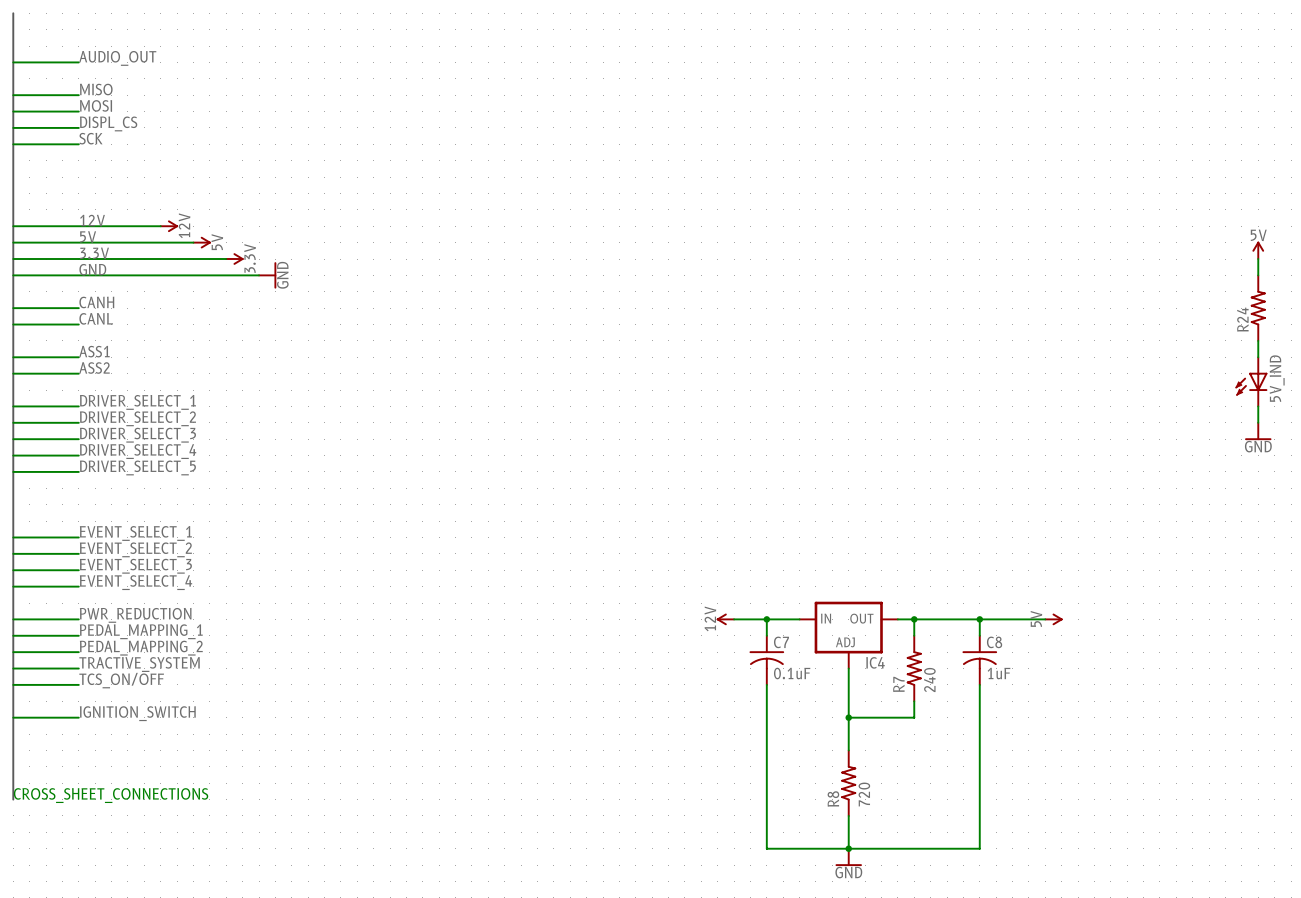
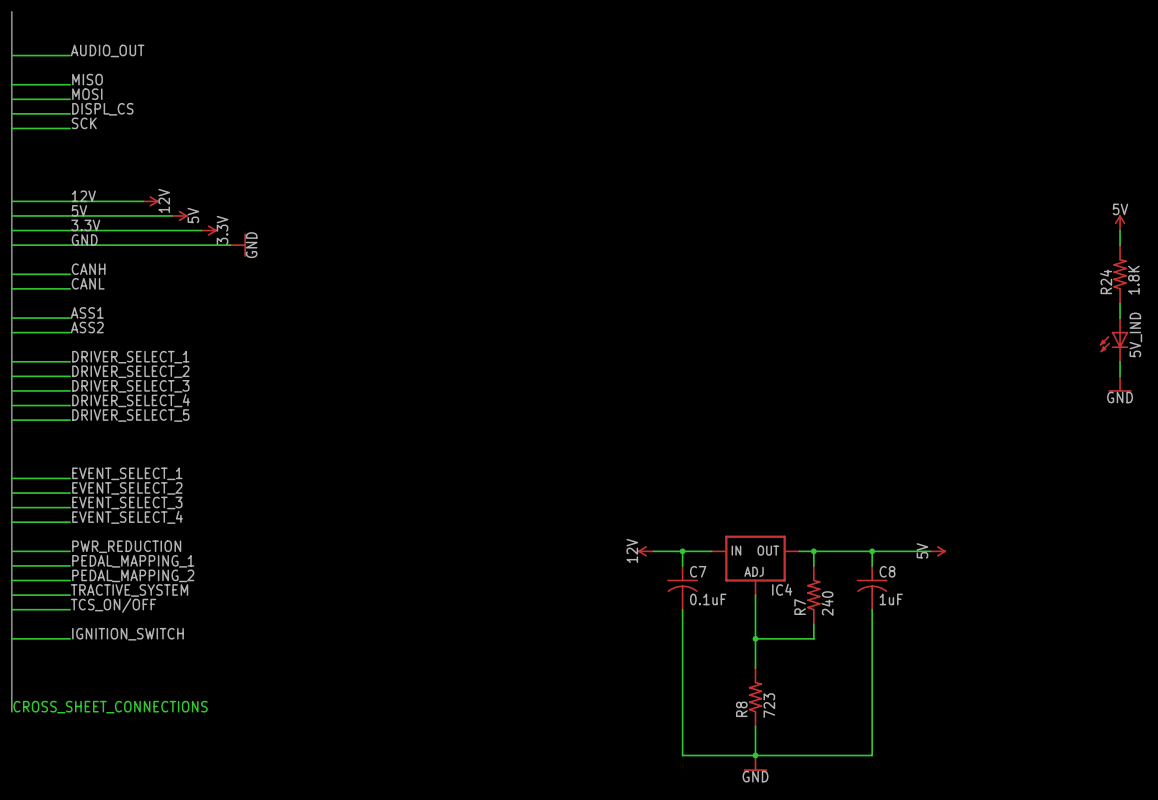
R24 value: none -> 1.8K (1133, 280)
R8 value: 720 (864, 794) -> 723 (769, 705)

